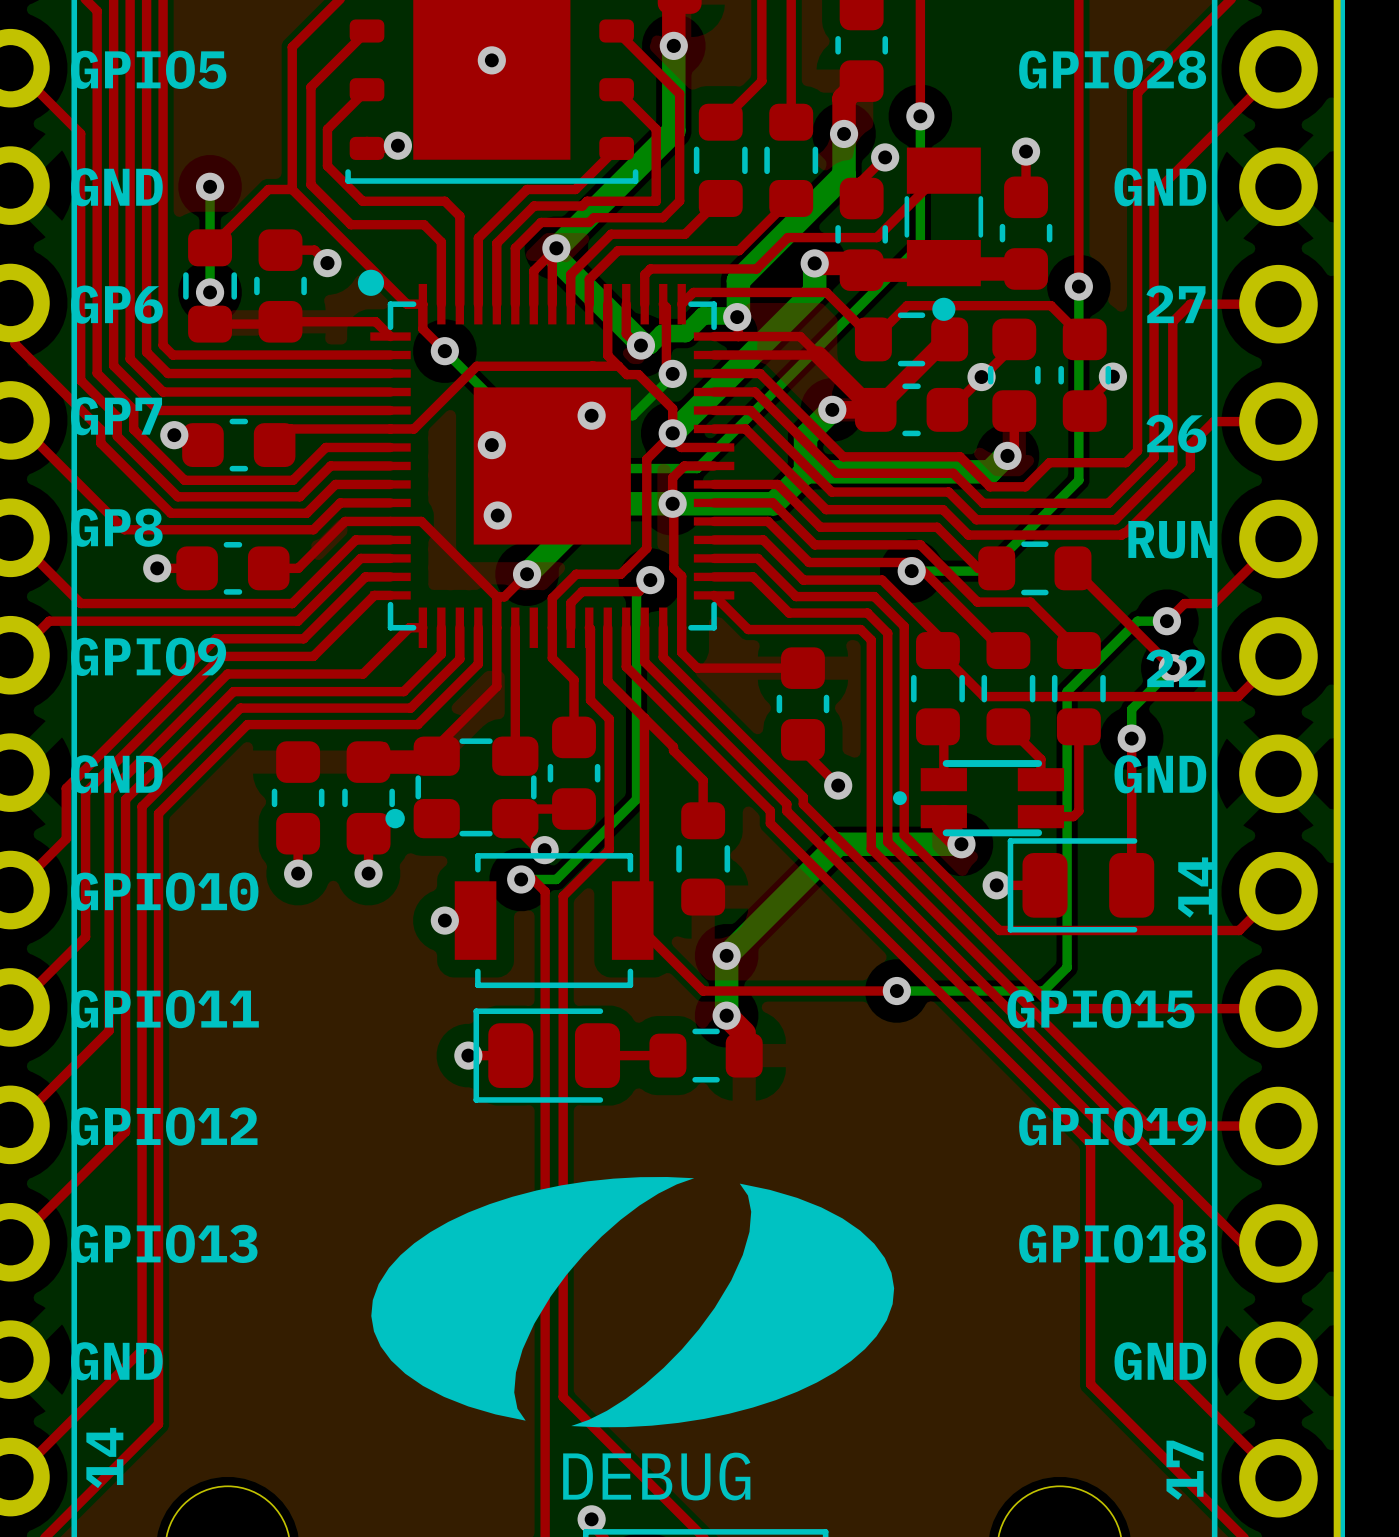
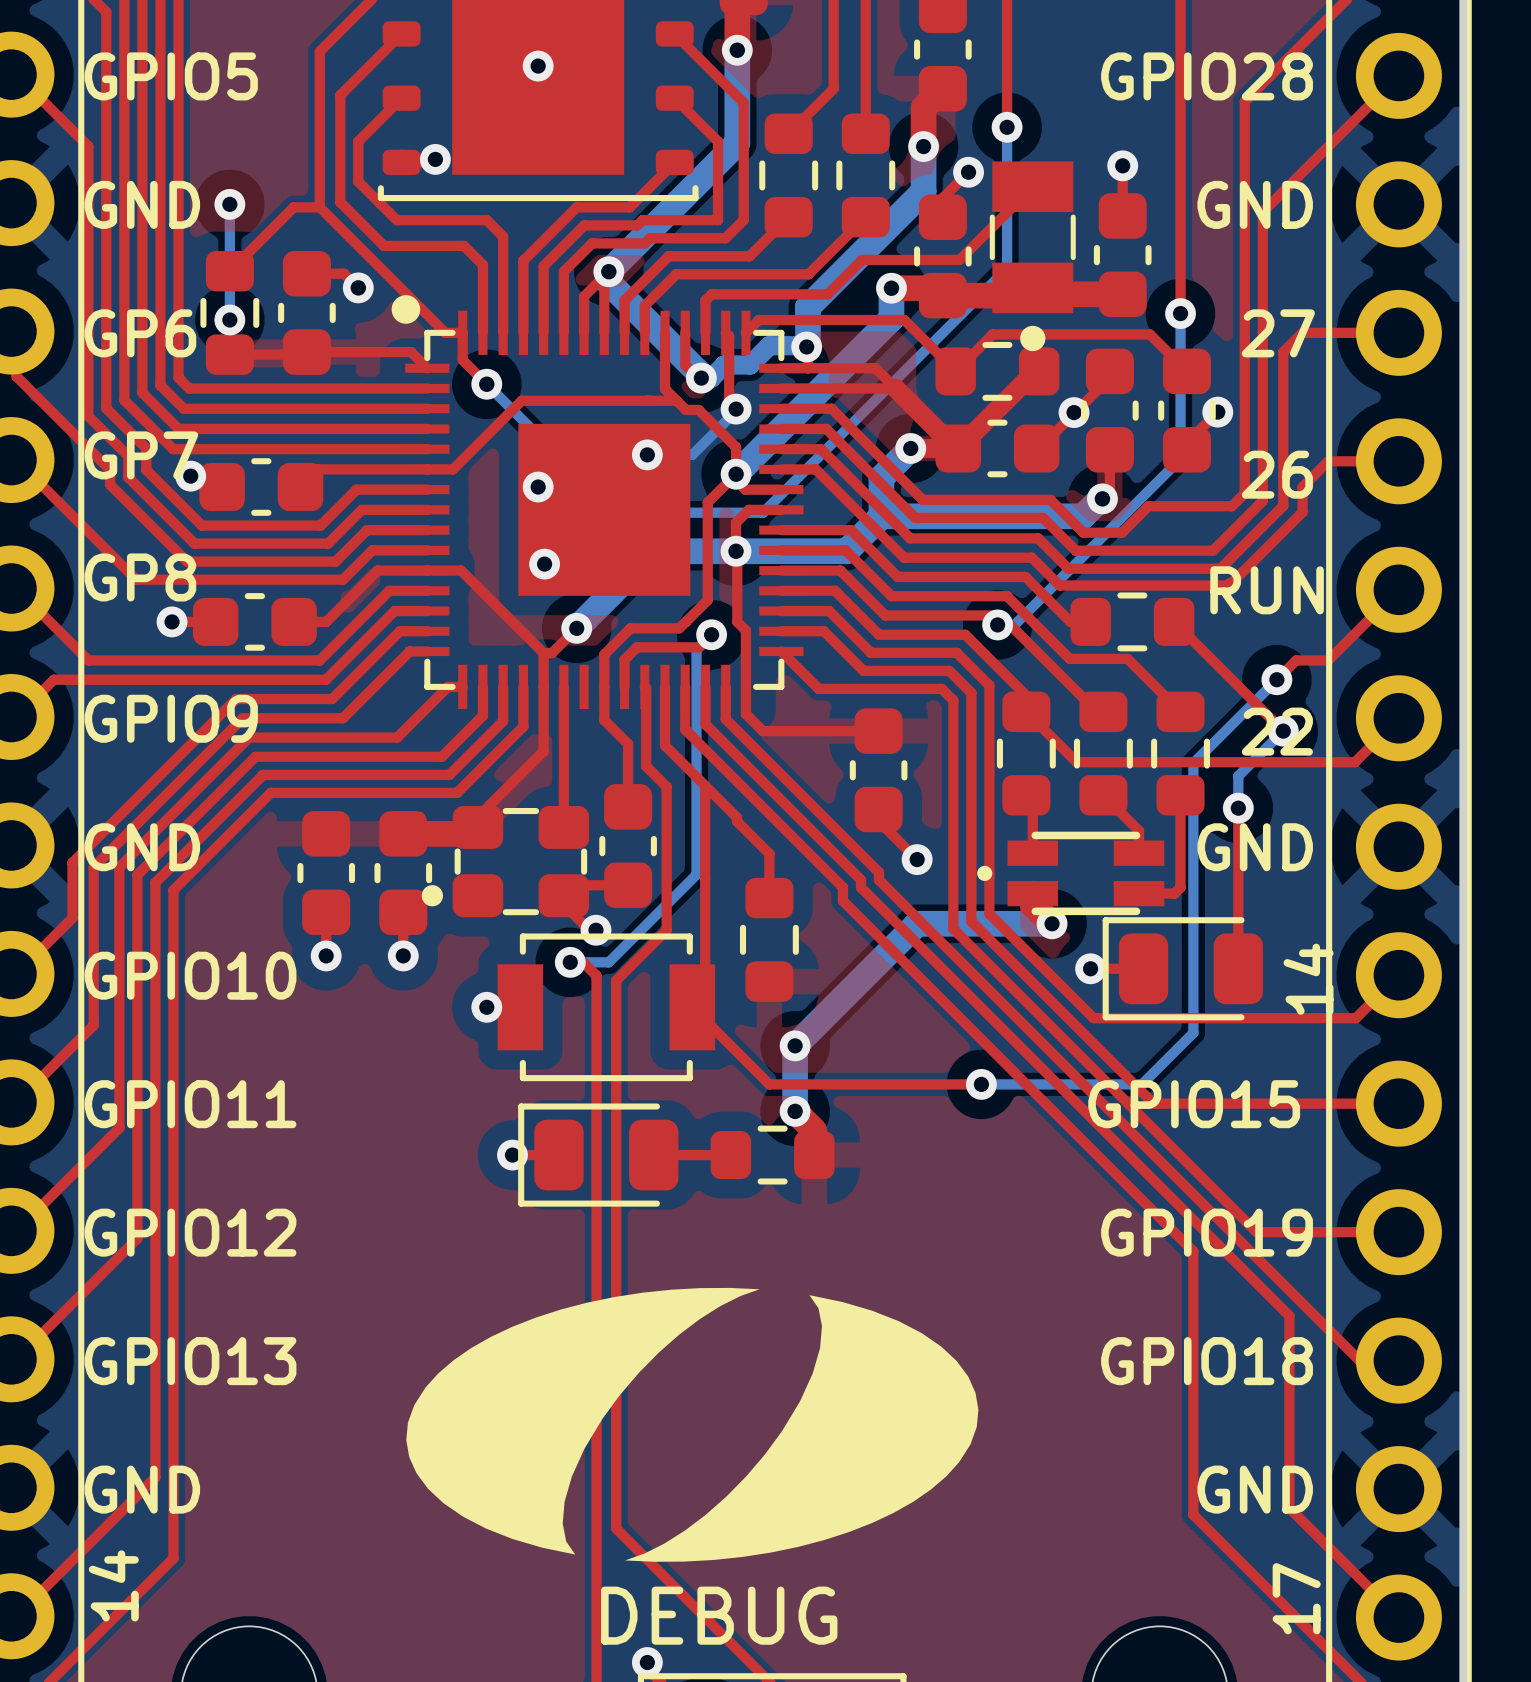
bottom track: (1078, 419) (1078, 480) (988, 571) (927, 571) -> (1180, 458) (1014, 624)
bottom track: (1166, 621) (1137, 621) (1067, 691) (1067, 967) -> (1276, 679) (1193, 763) (1193, 1033) (1167, 1058)

